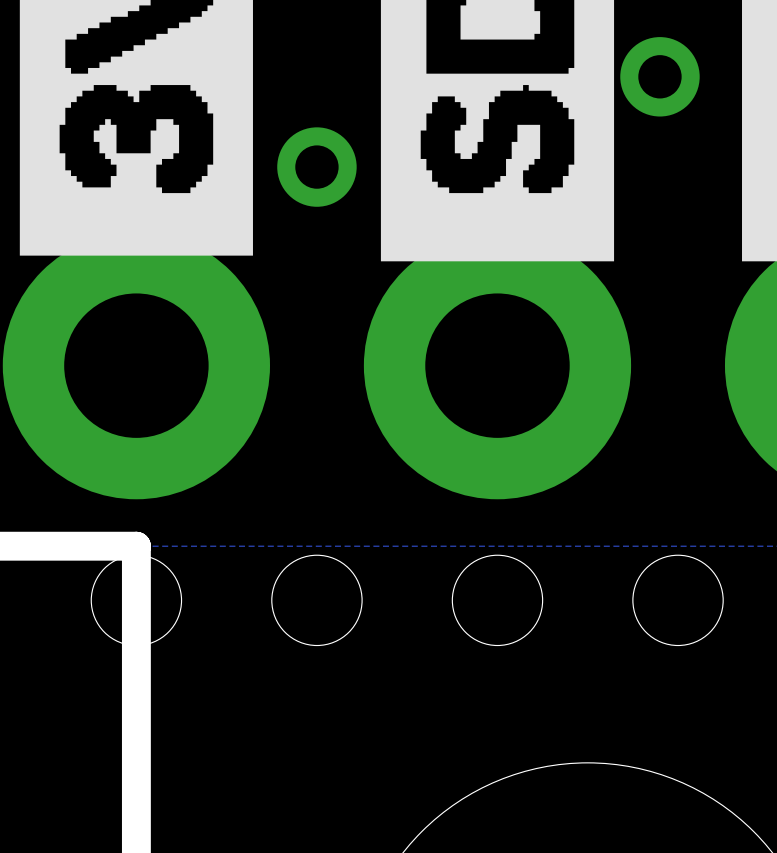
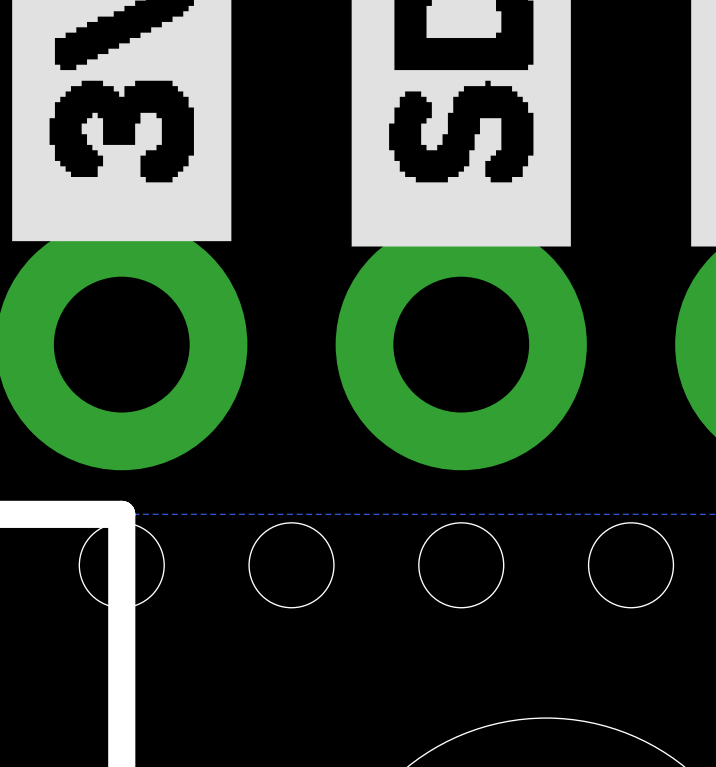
via: (659, 76) -> none
via: (316, 167) -> none

